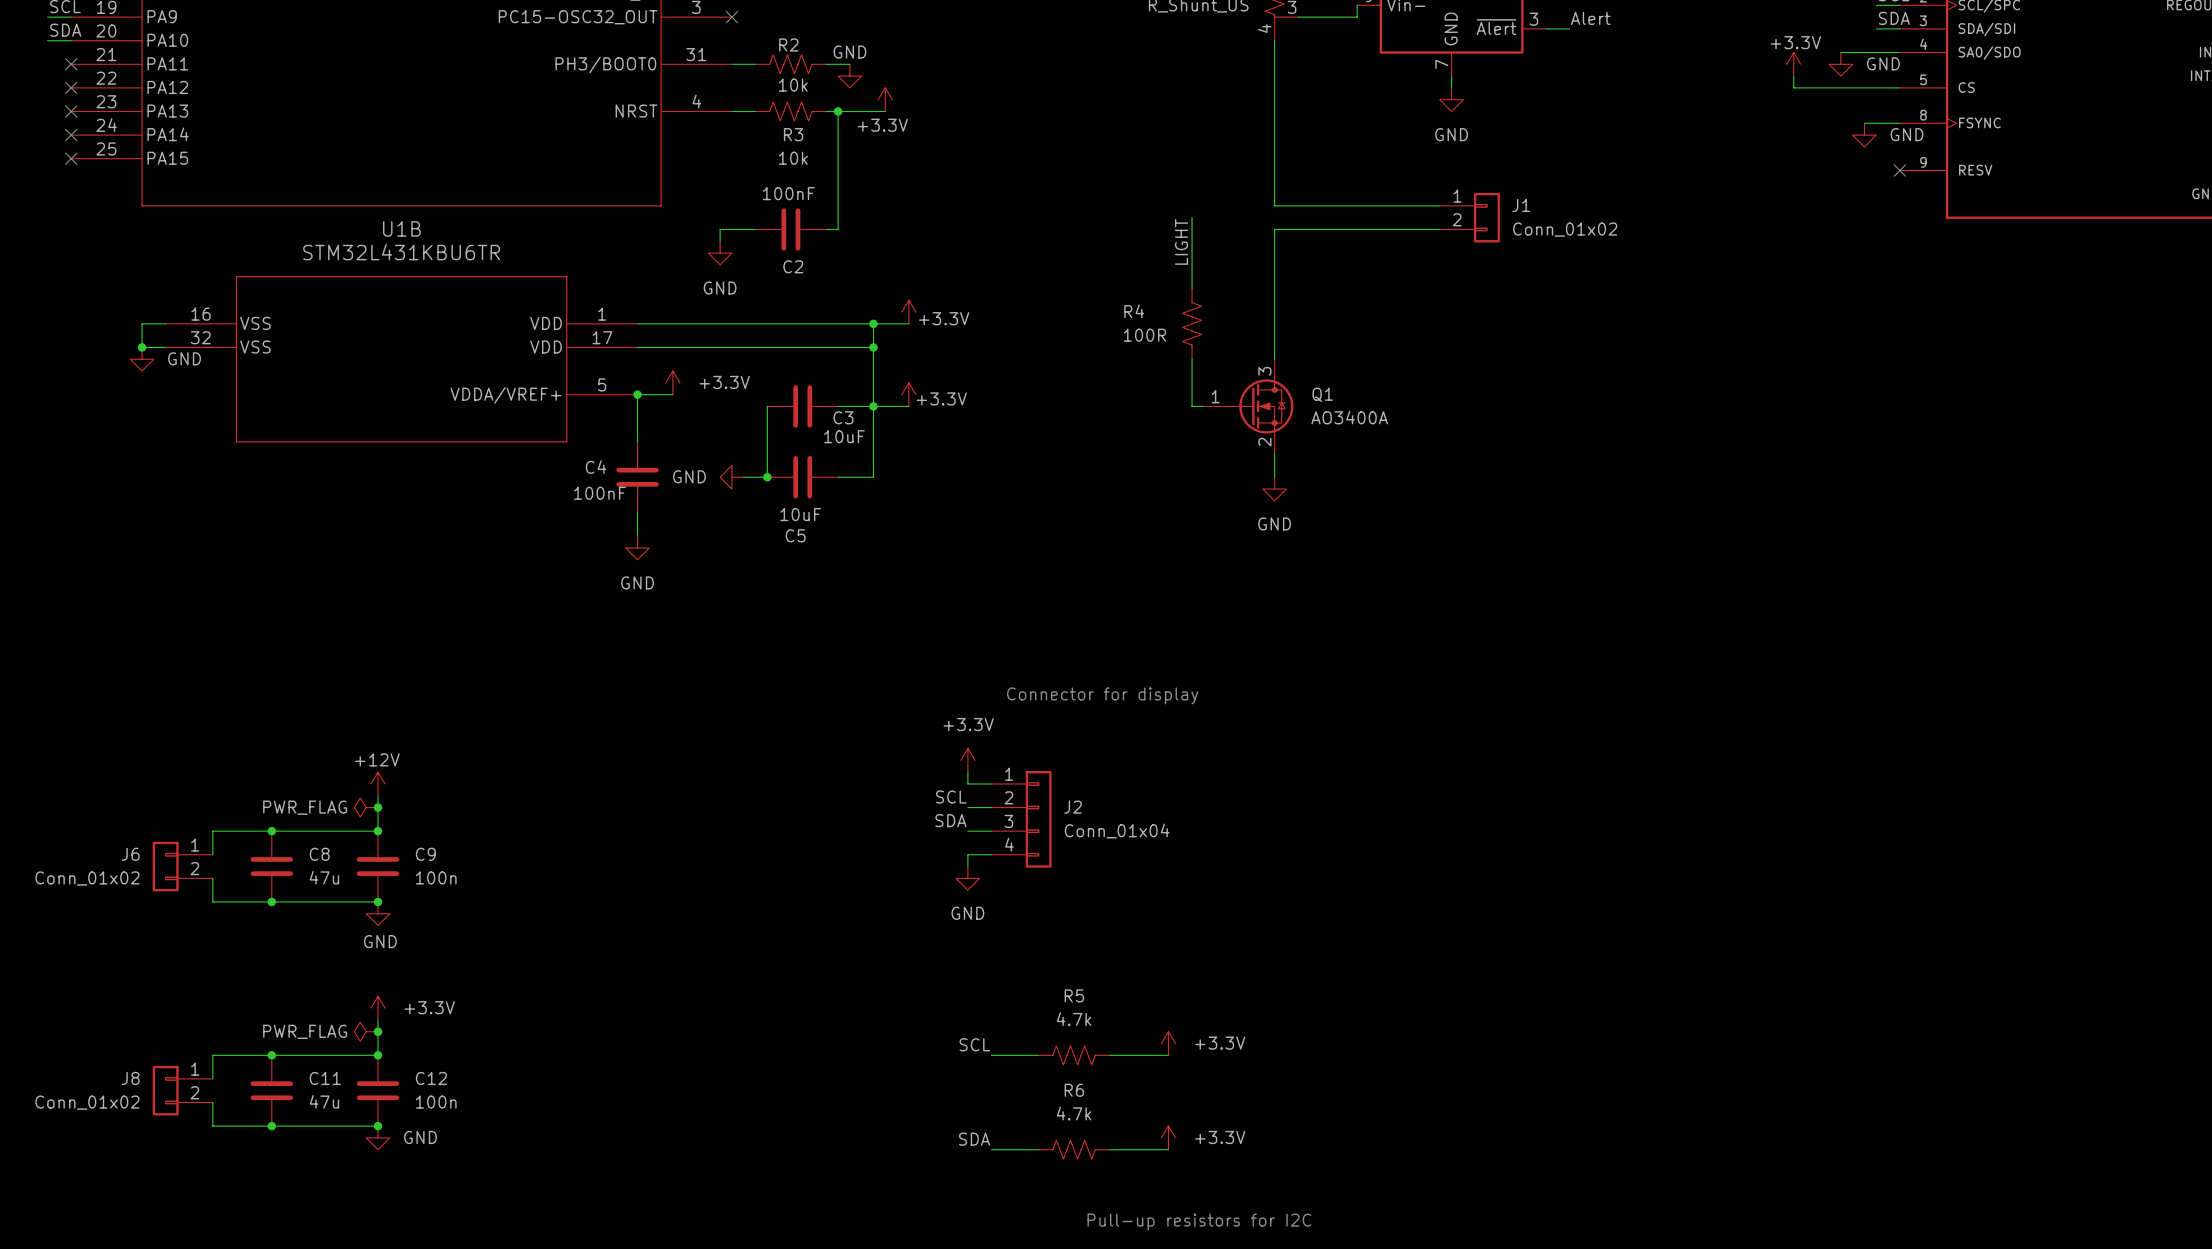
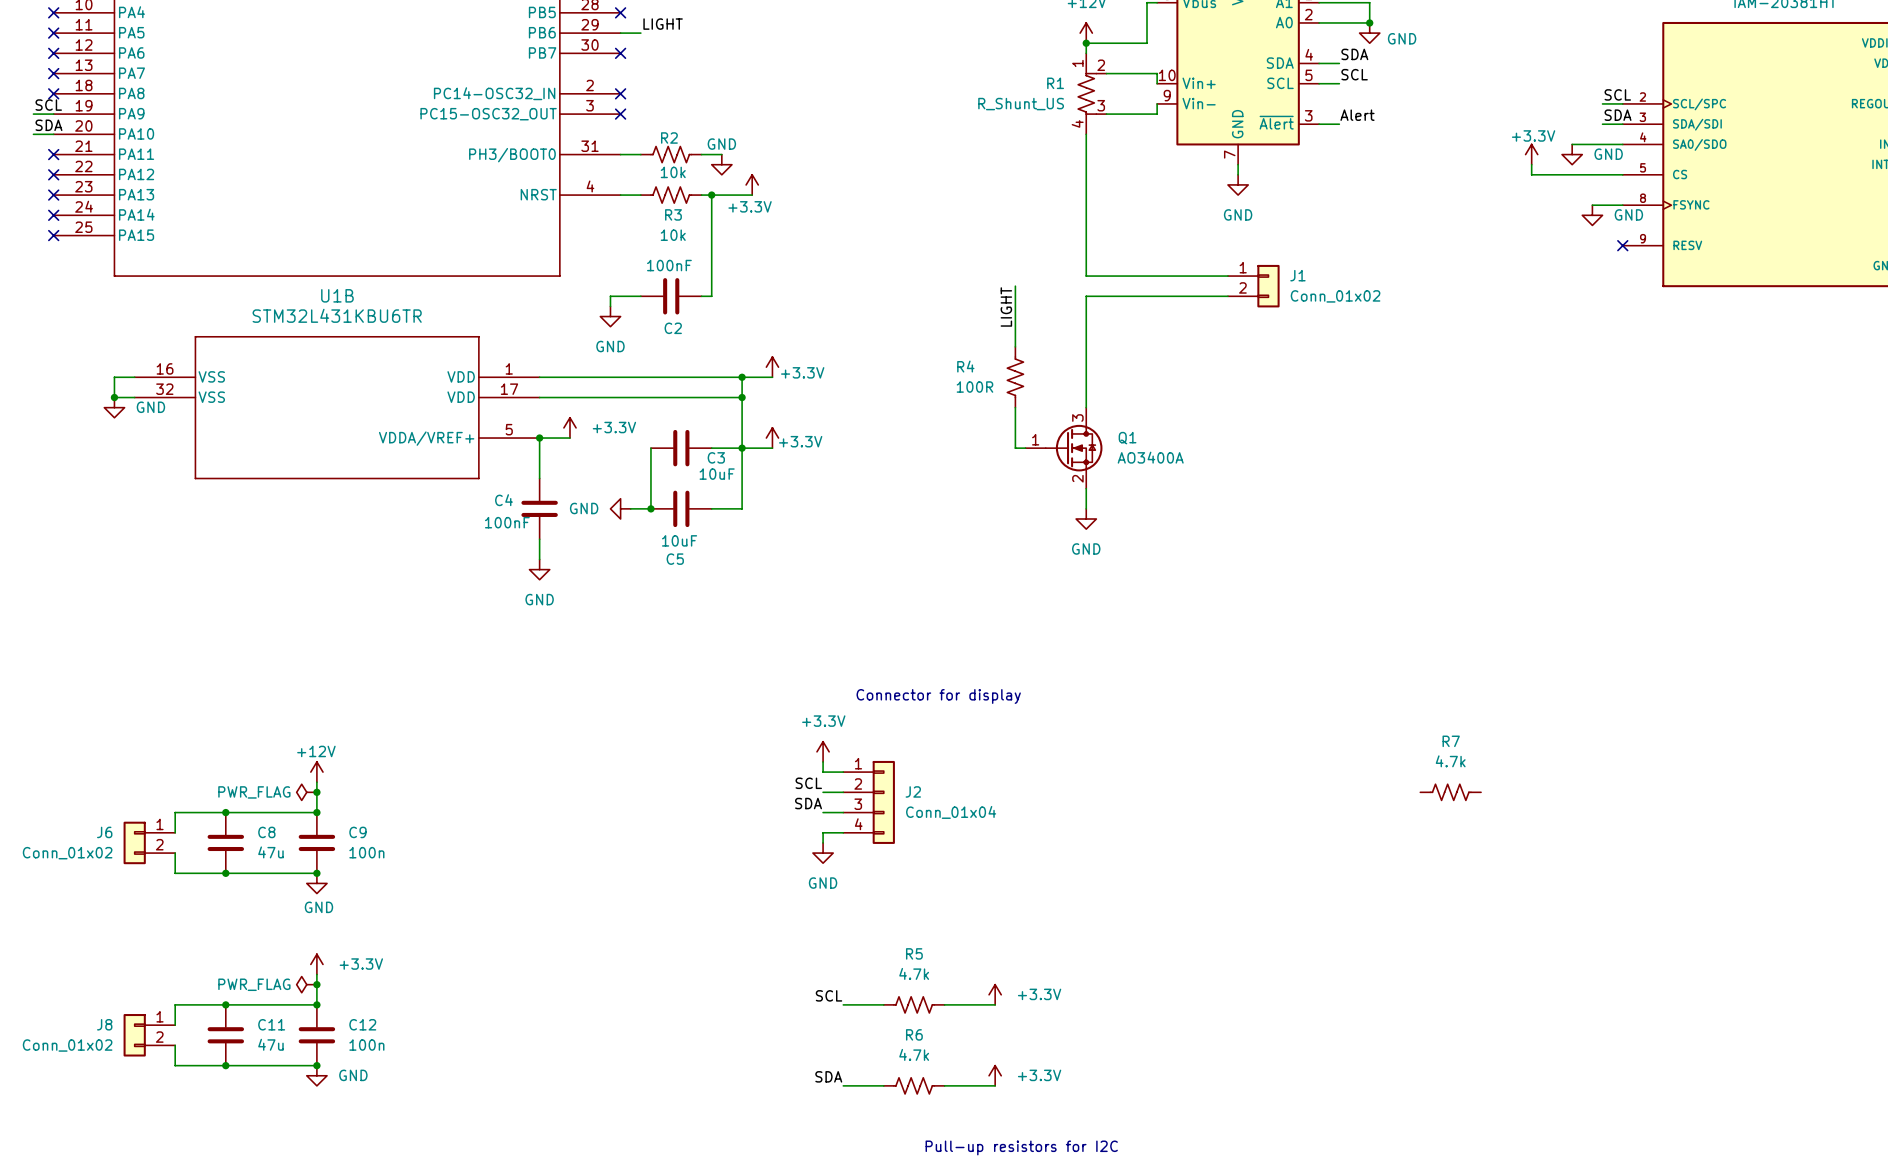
R7: none -> 4.7k (1450, 792)

